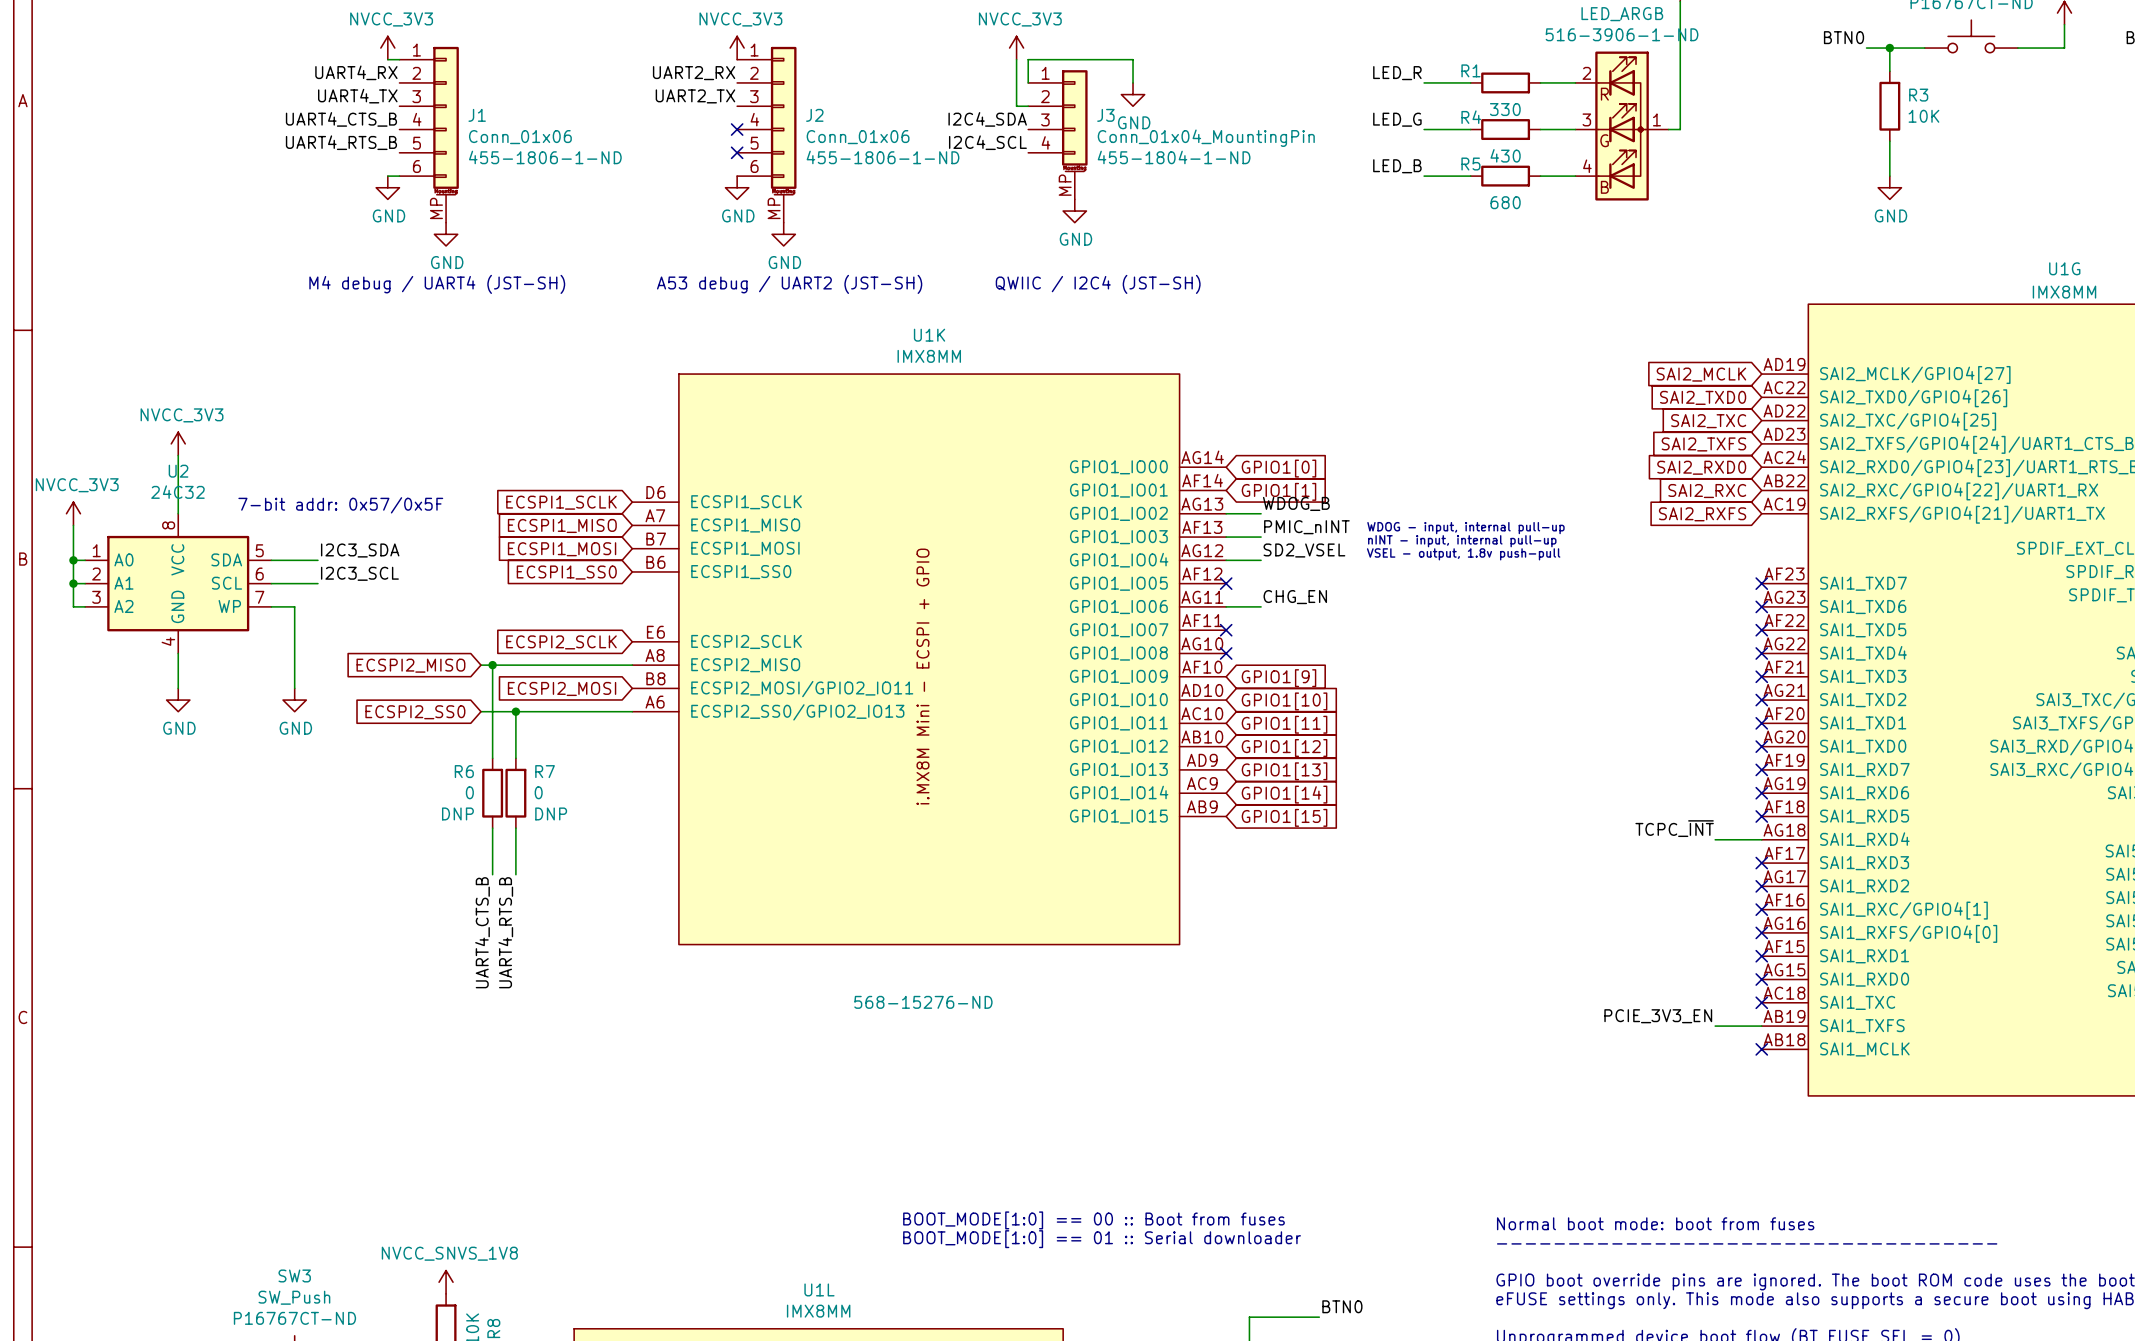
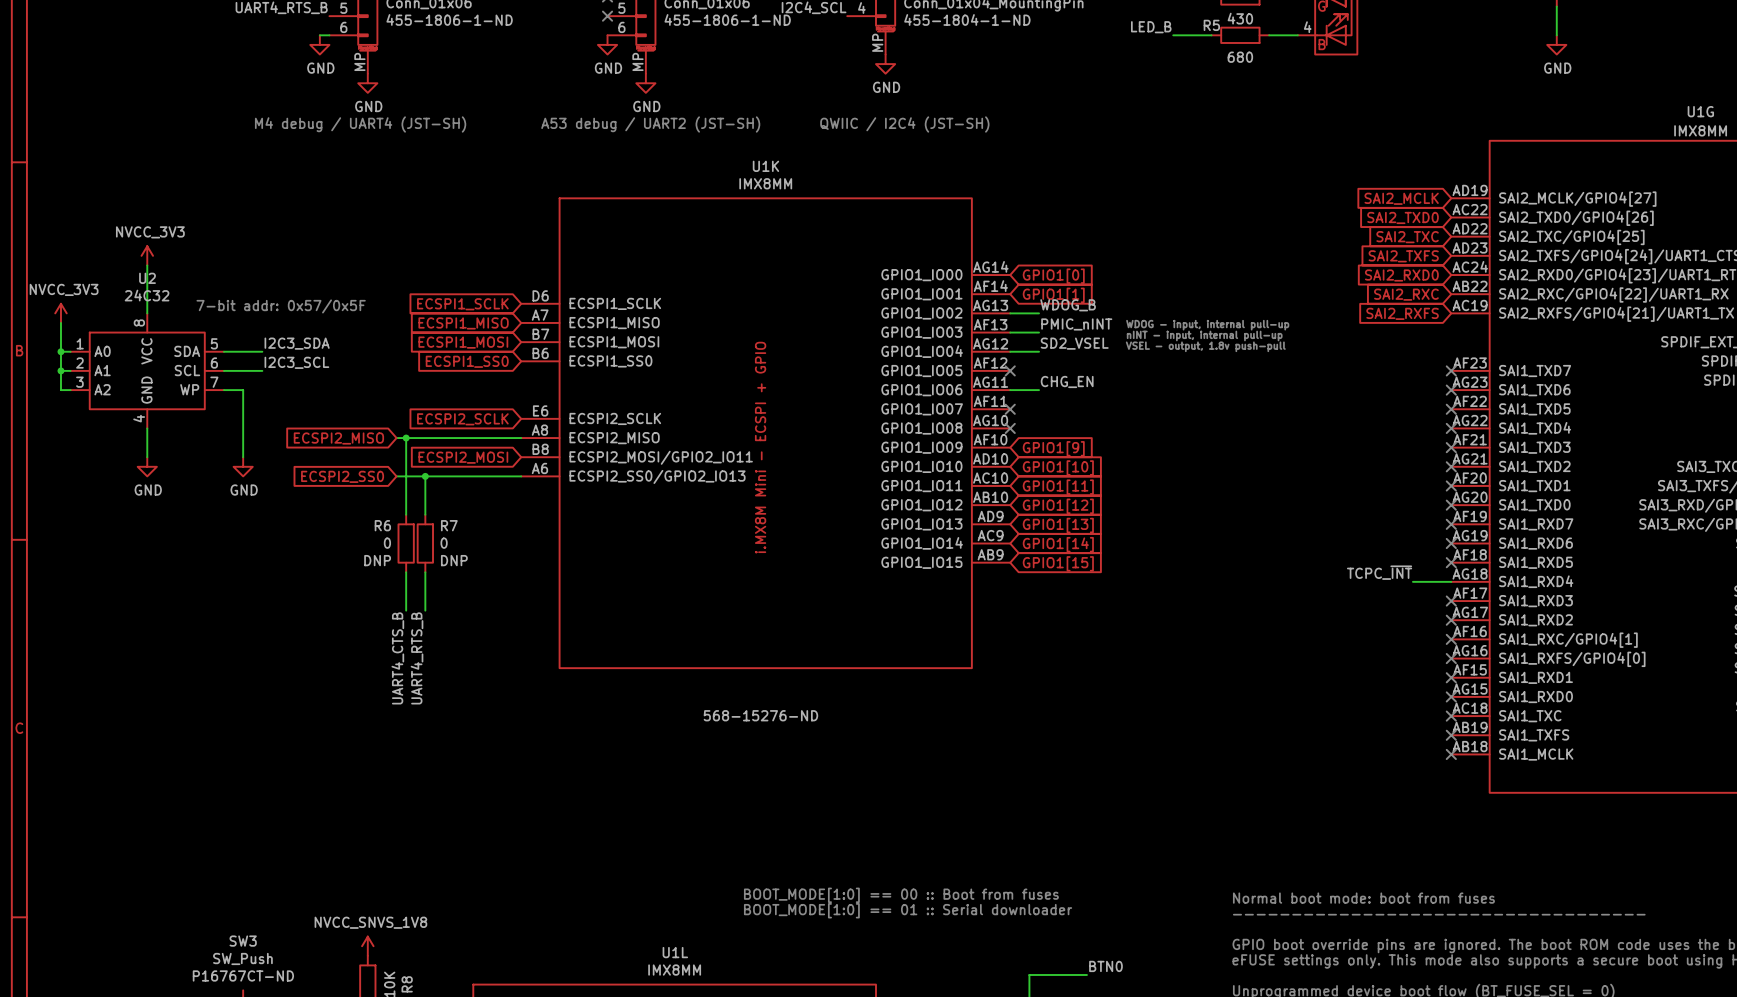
label: PCIE_3V3_EN (1658, 1016) -> none
wire: (1715, 1026) (1761, 1026) -> none
no-connect mark: none -> (1451, 735)

